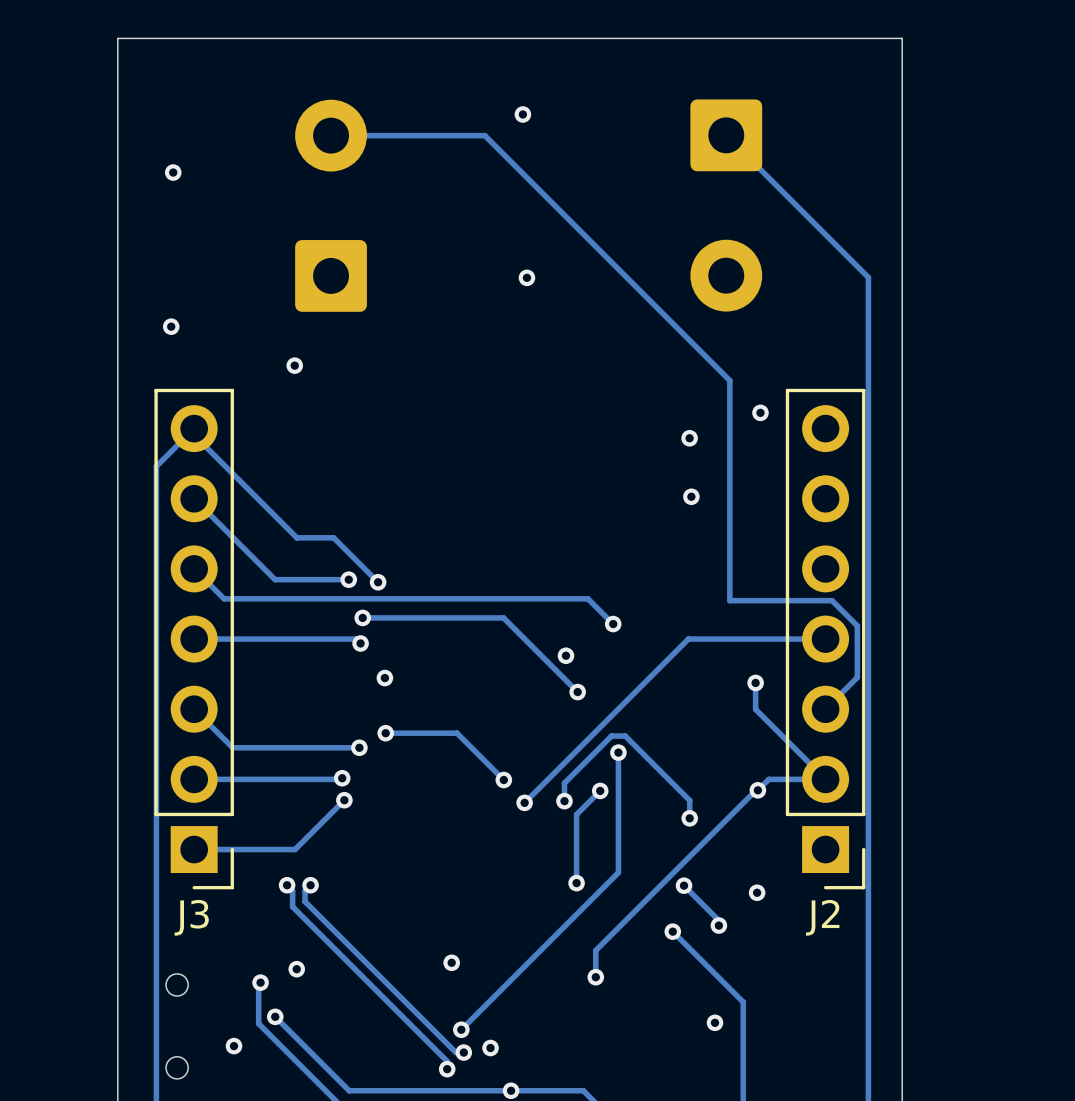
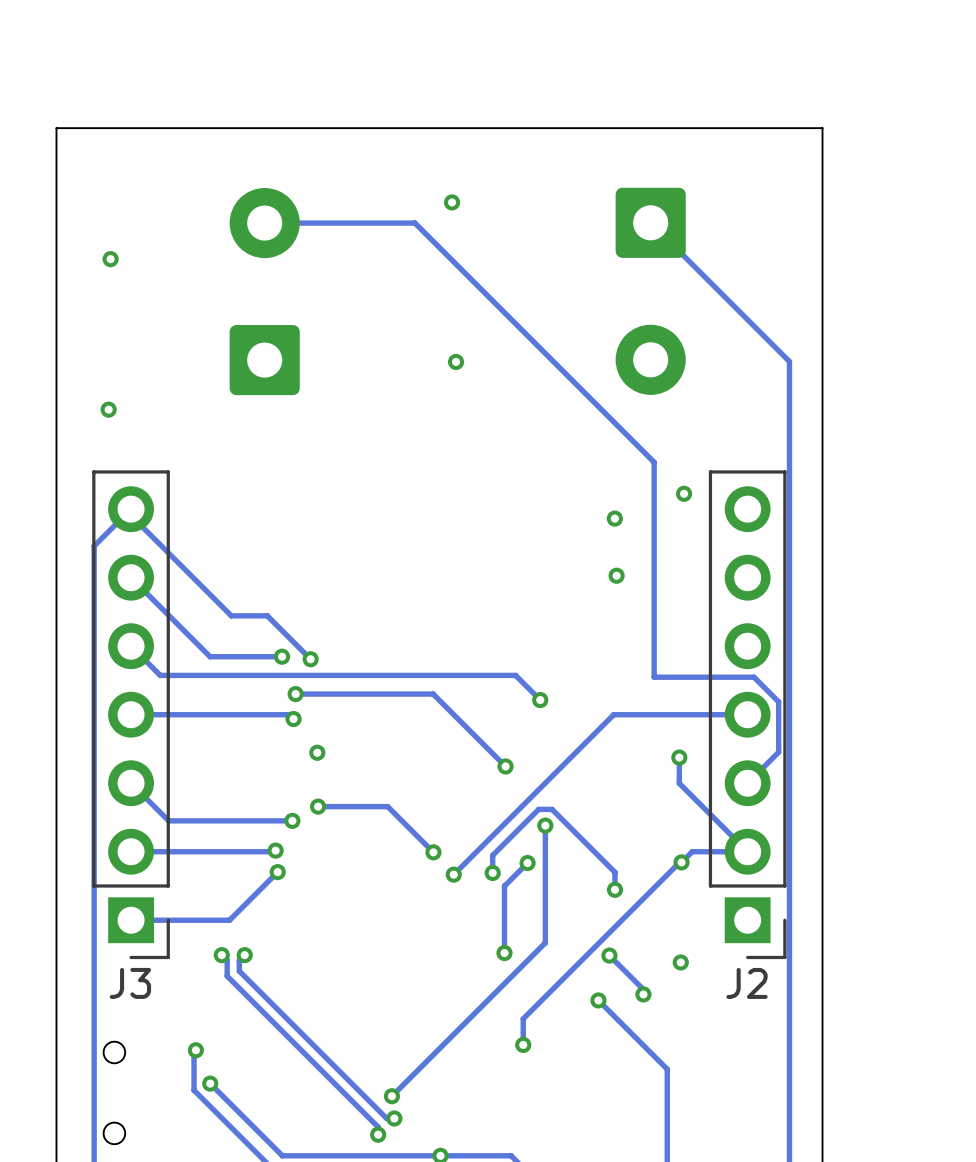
via: (294, 365) -> none
via: (565, 655) -> none
via: (451, 962) -> none
via: (296, 969) -> none
via: (714, 1022) -> none
via: (234, 1046) -> none
via: (490, 1048) -> none

